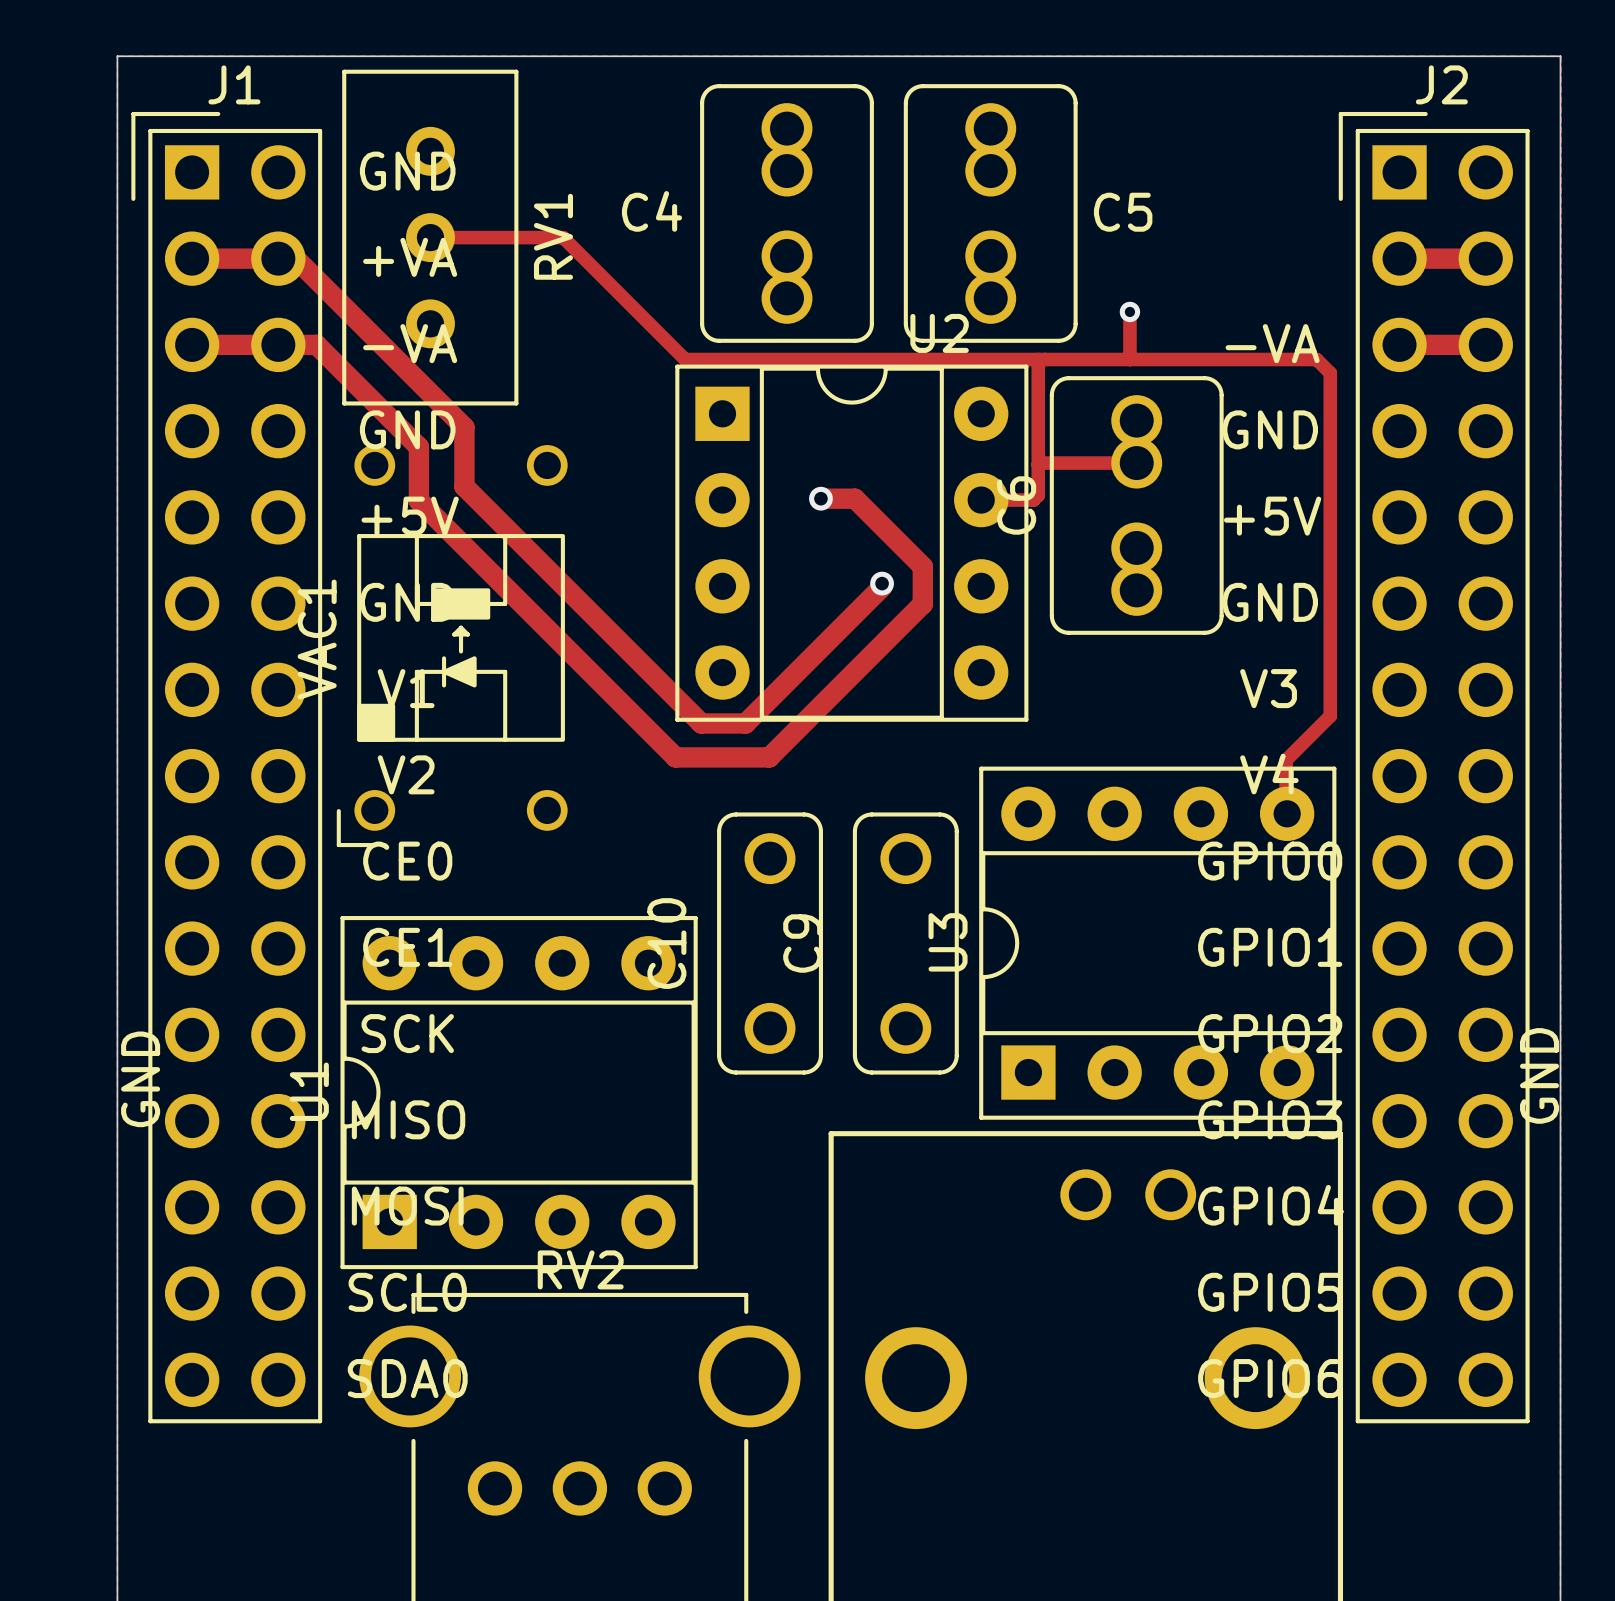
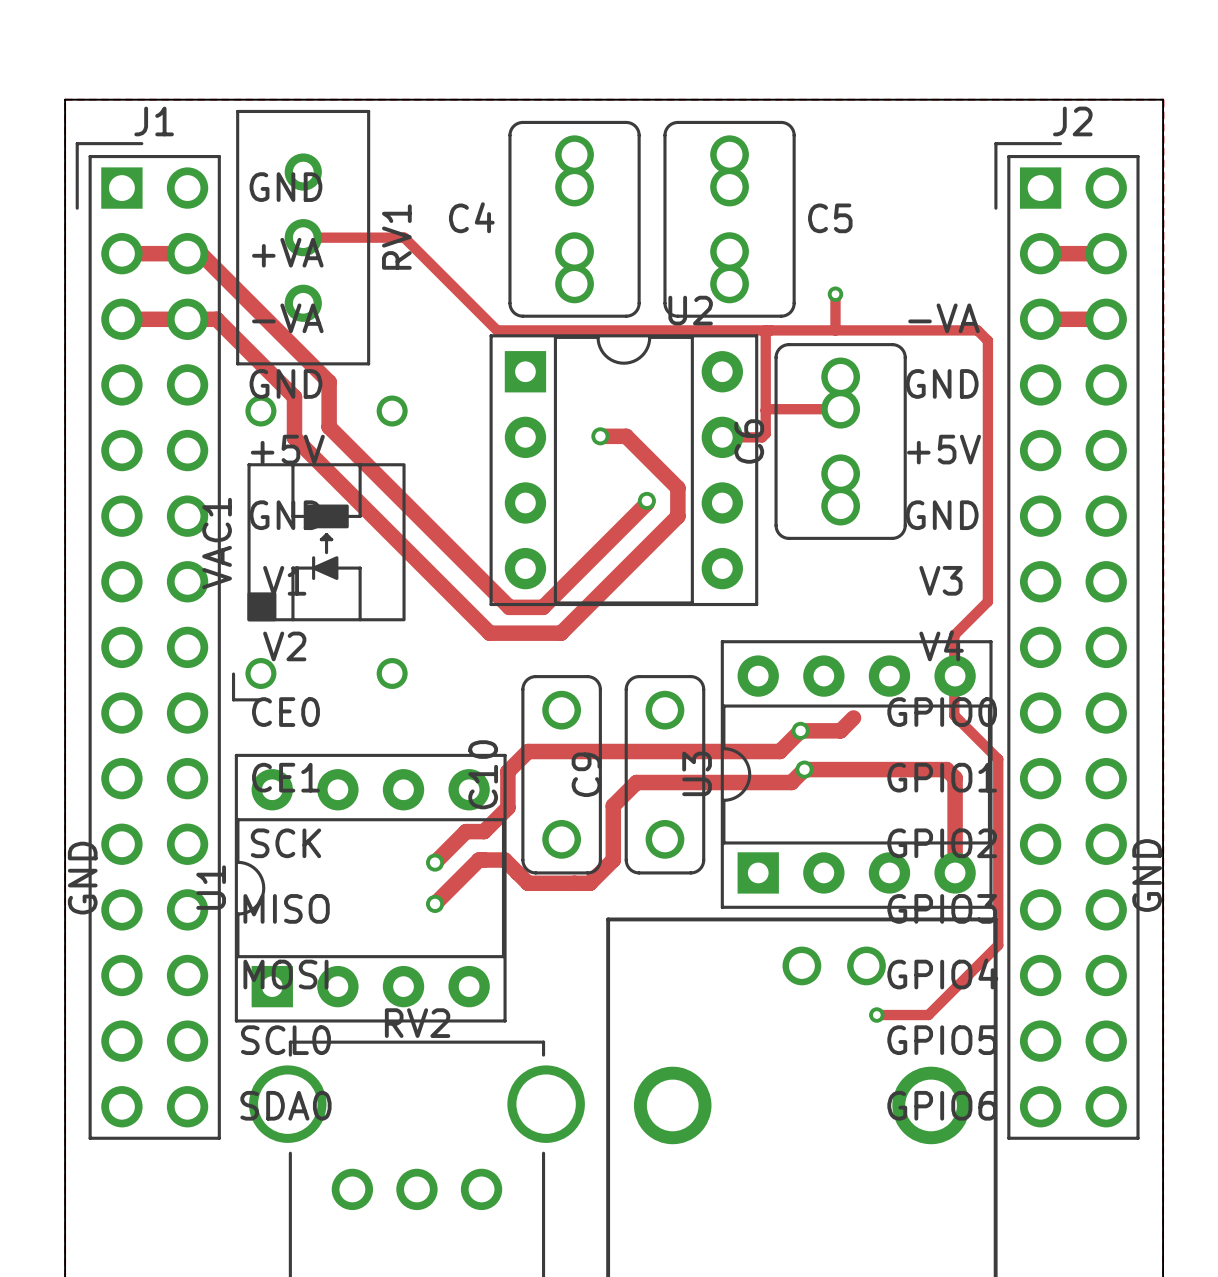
track: none -> (955, 676) (954, 715) (998, 759) (998, 945) (928, 1015) (876, 1015)
track: none -> (853, 717) (840, 730) (800, 730) (779, 751) (528, 751) (507, 771) (507, 807) (484, 831) (466, 831) (435, 862)
via: none -> (800, 730)
via: none -> (804, 769)
via: none -> (435, 862)
track: none -> (955, 872) (955, 778) (946, 769) (804, 769) (791, 782) (636, 782) (613, 805) (613, 860) (590, 883) (528, 883) (504, 860) (478, 860) (435, 903)
via: none -> (435, 903)
via: none -> (876, 1015)

